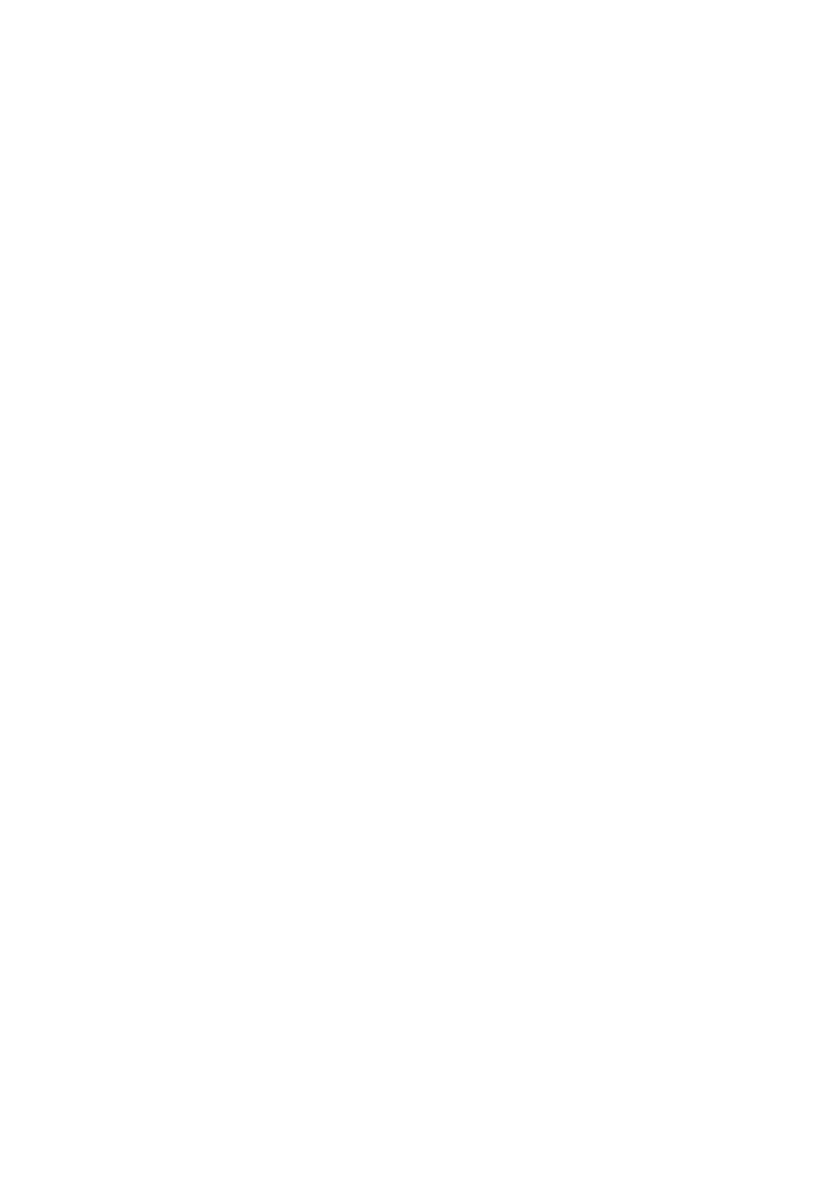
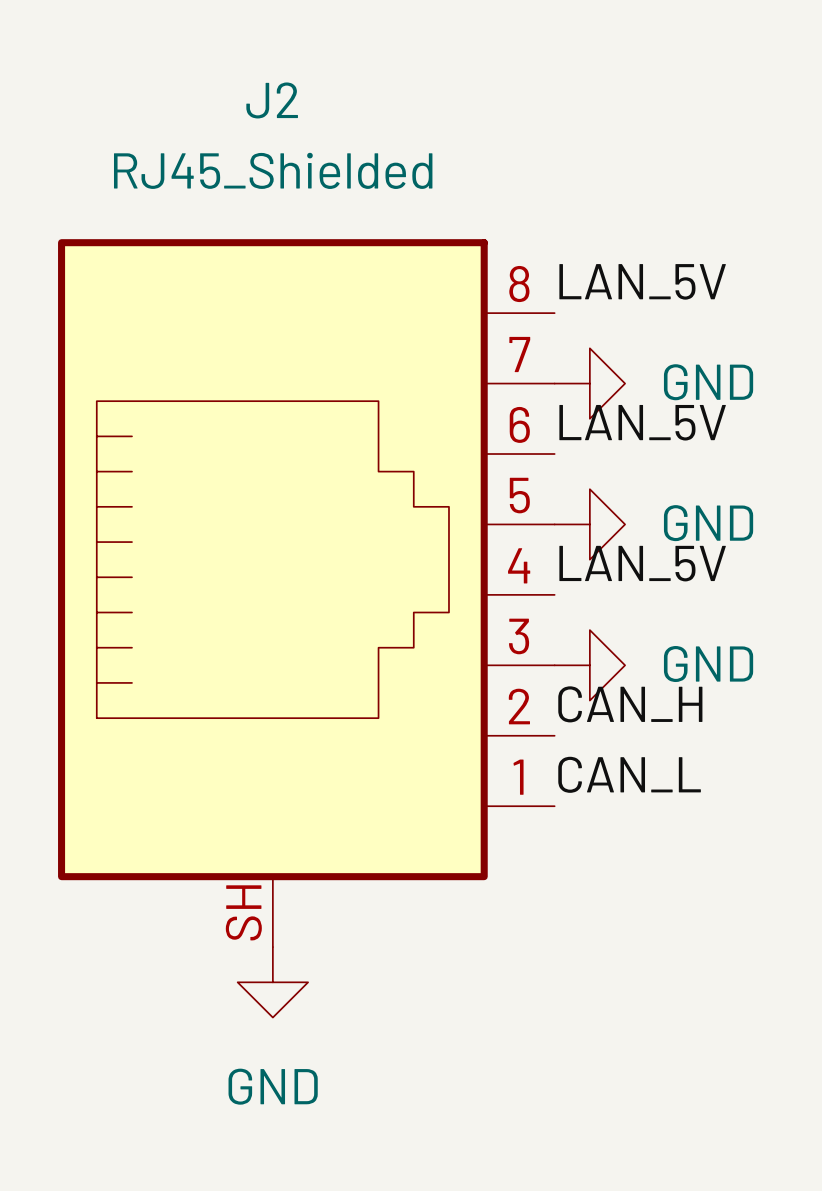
label: none -> LAN_5V (642, 281)
power symbol: none -> GND (589, 383)
label: none -> LAN_5V (642, 422)
power symbol: none -> GND (589, 524)
label: none -> LAN_5V (642, 563)
J2: none -> RJ45_Shielded (306, 593)
power symbol: none -> GND (589, 665)
label: none -> CAN_H (630, 704)
label: none -> CAN_L (629, 774)
power symbol: none -> GND (272, 982)

